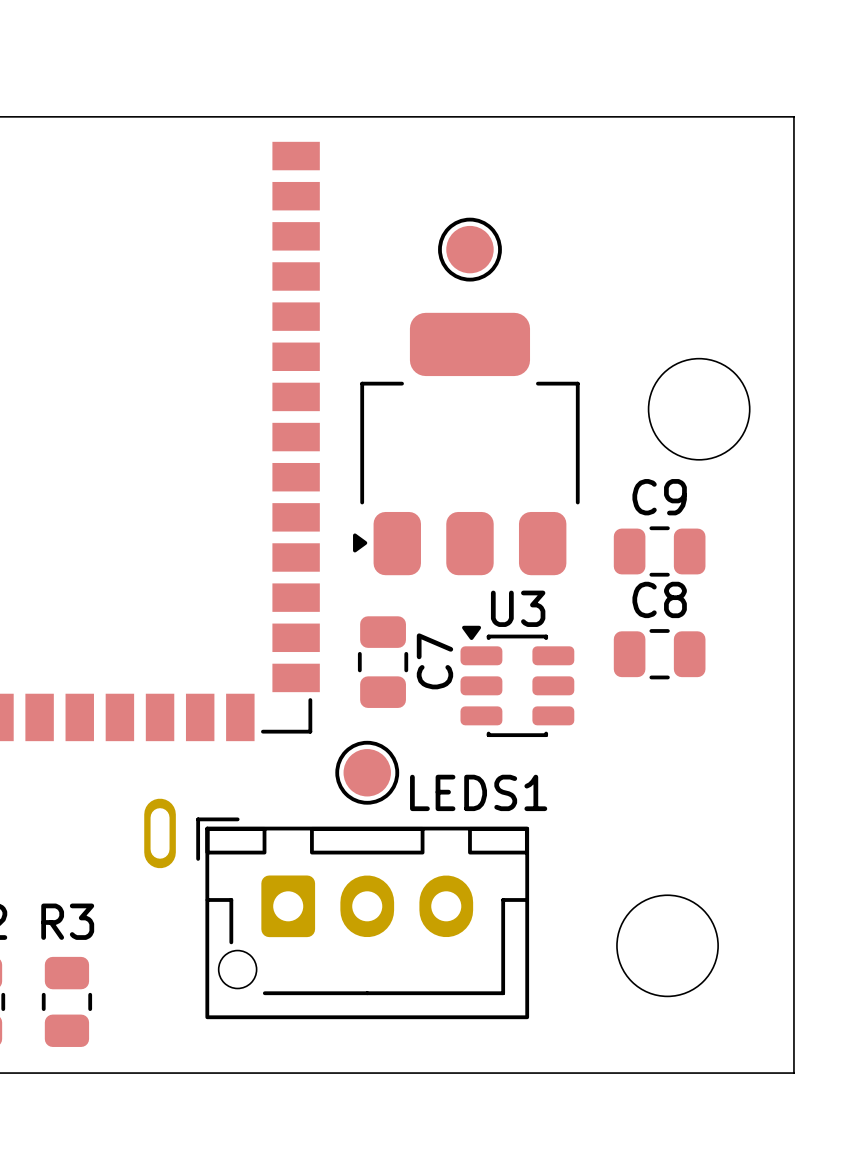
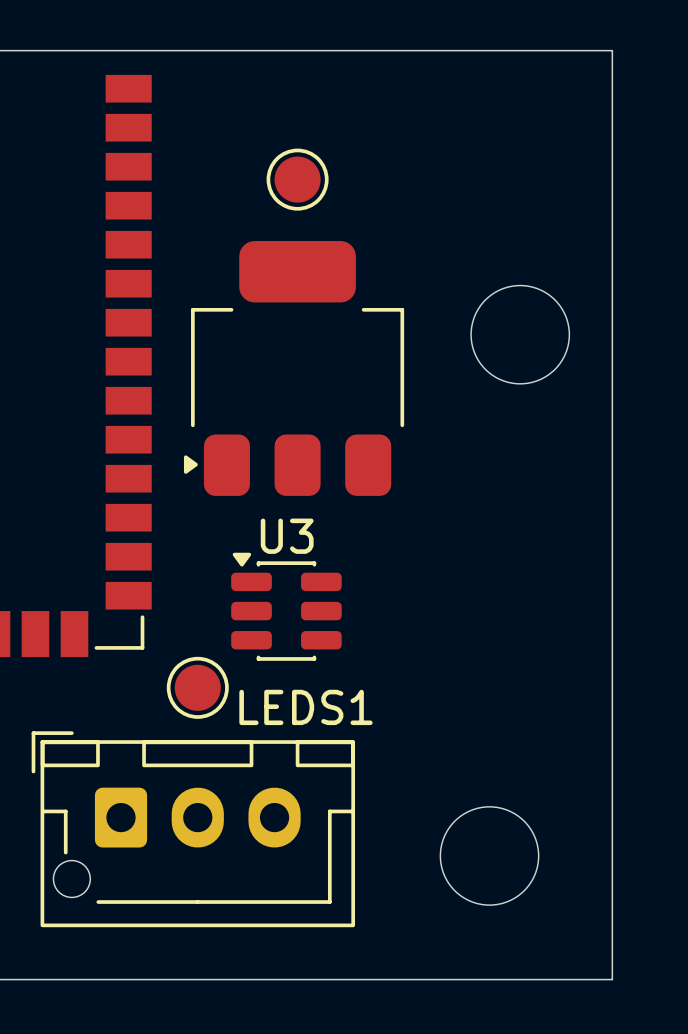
C9: (659, 551) -> none
C8: (659, 654) -> none
C7: (383, 662) -> none
U3 position: (517, 681) -> (286, 606)

